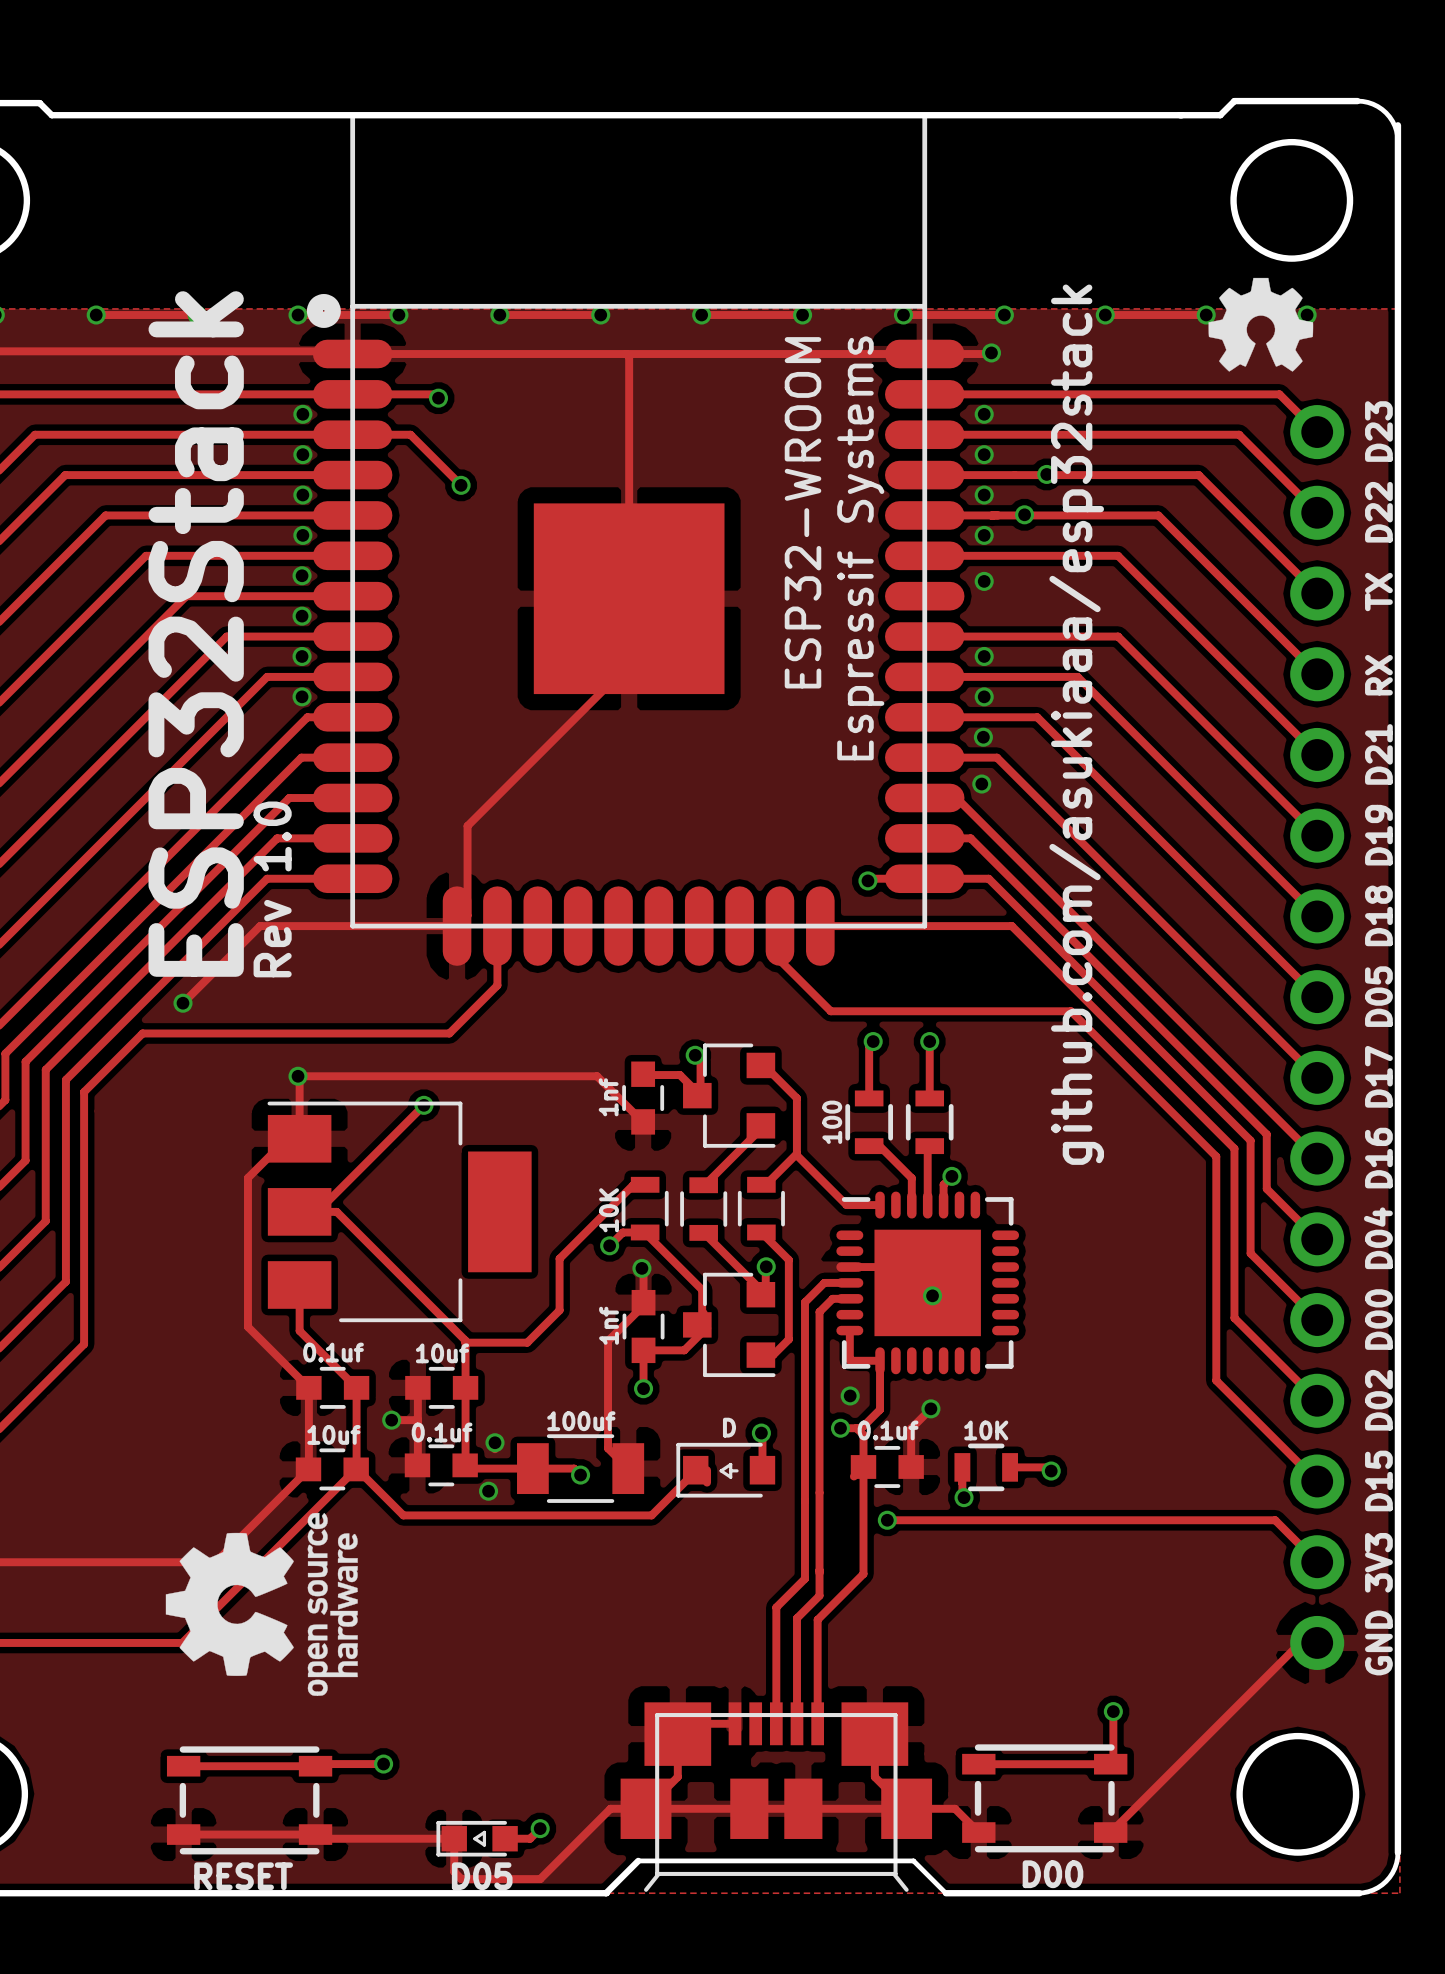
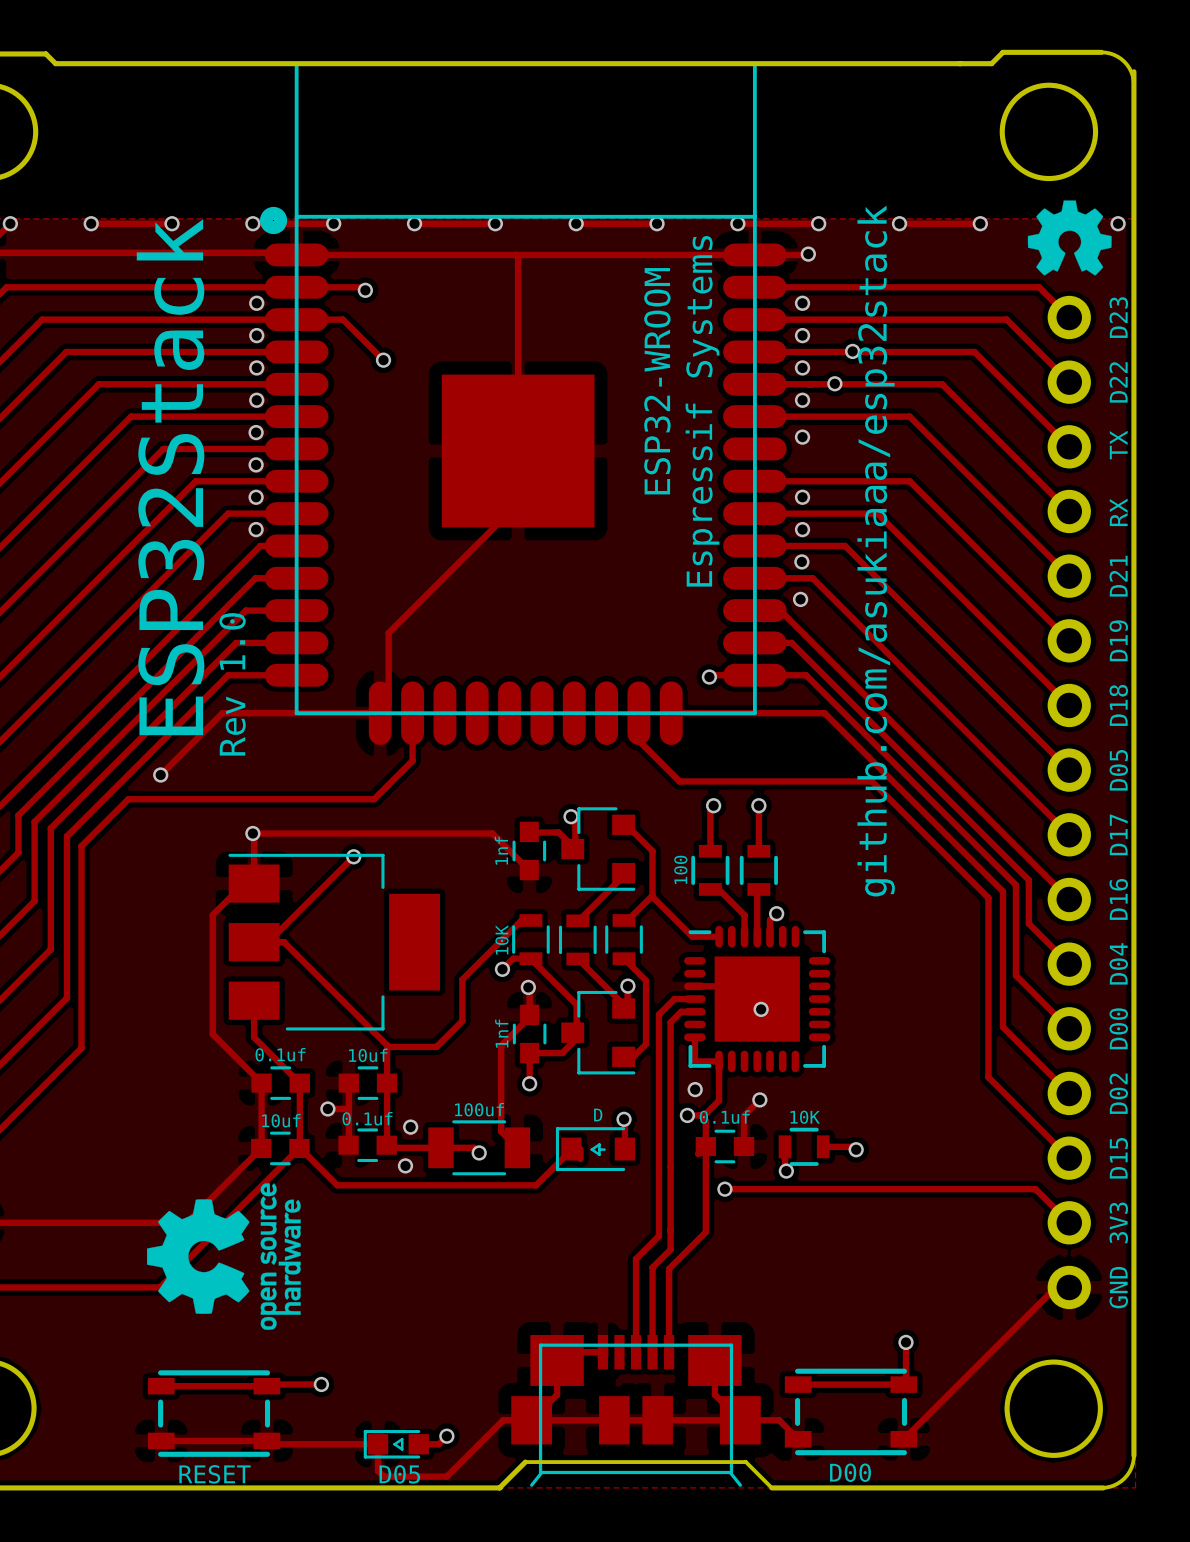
via position: (1307, 315) -> (1118, 223)
drawing position: (1260, 324) -> (1069, 237)

